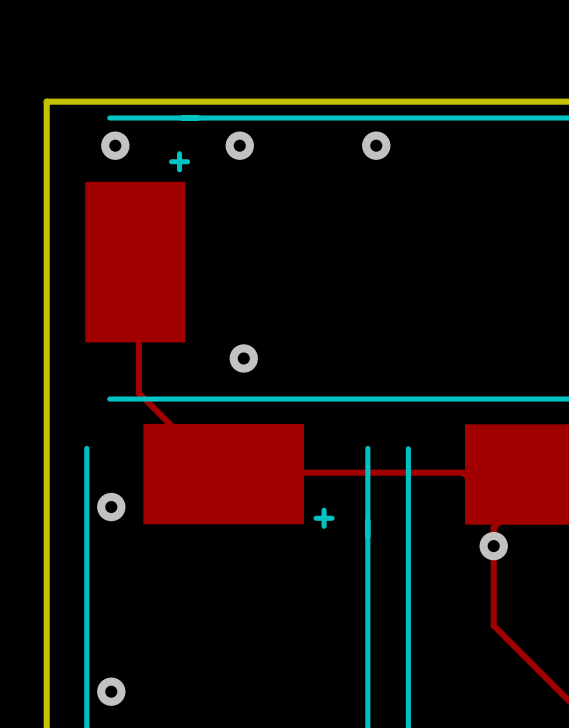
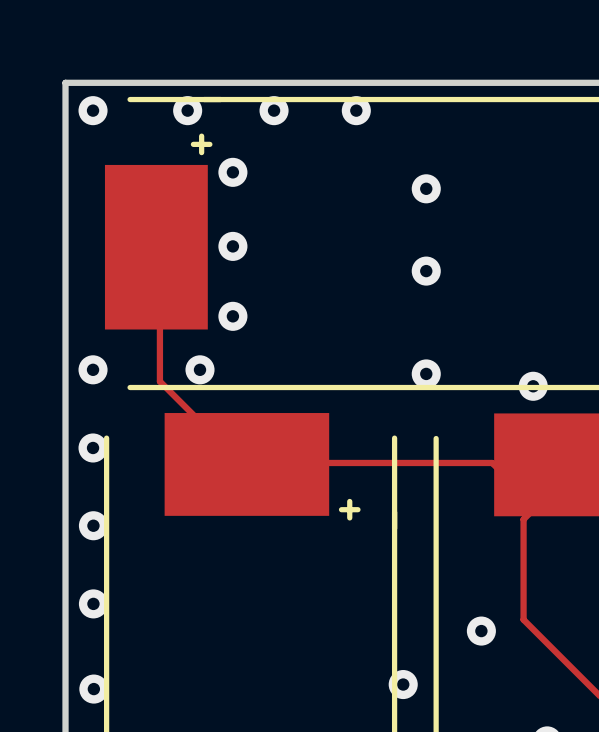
via: none -> (93, 110)
via: none -> (187, 110)
via: none -> (356, 110)
via: (115, 145) -> none
via position: (239, 145) -> (274, 110)
via: (376, 145) -> none
via: none -> (232, 172)
via: none -> (426, 188)
via: none -> (232, 246)
via: none -> (426, 271)
via: none -> (232, 316)
via: (243, 358) -> none
via: none -> (93, 369)
via: none -> (200, 369)
via: none -> (426, 373)
via: none -> (533, 386)
via: none -> (93, 447)
via: (111, 507) -> none
via: none -> (93, 525)
via: (493, 546) -> none
via: none -> (93, 603)
via: none -> (481, 631)
via: none -> (403, 684)
via position: (111, 691) -> (93, 689)

